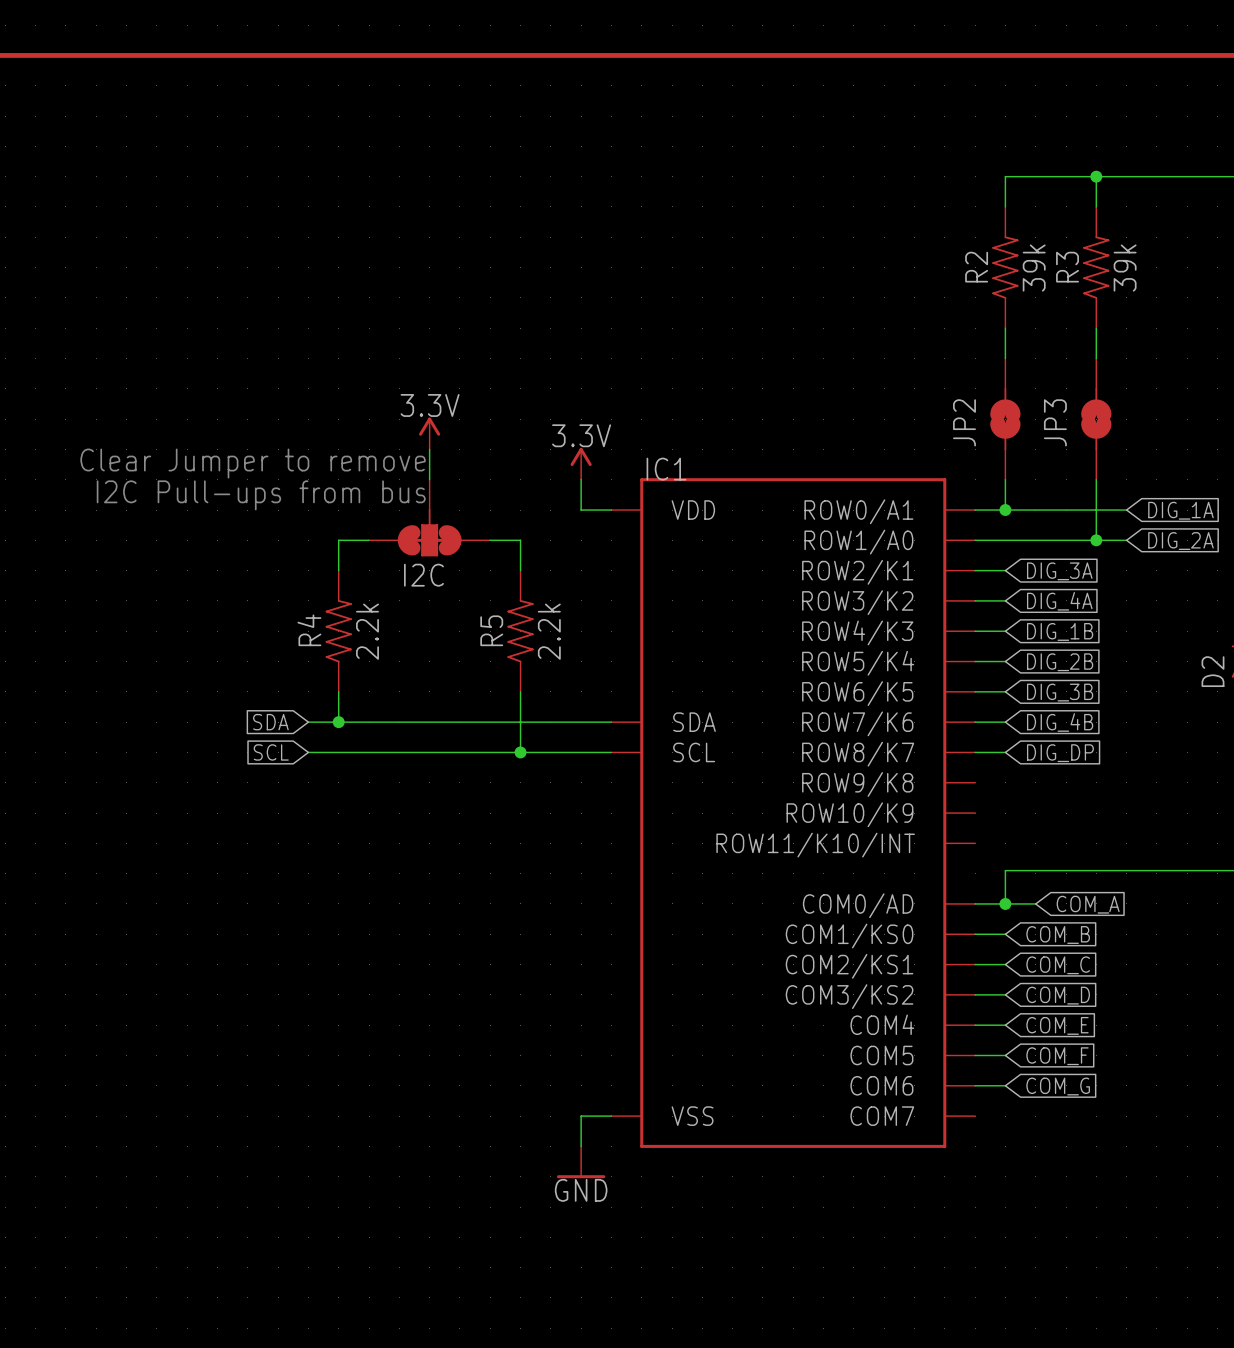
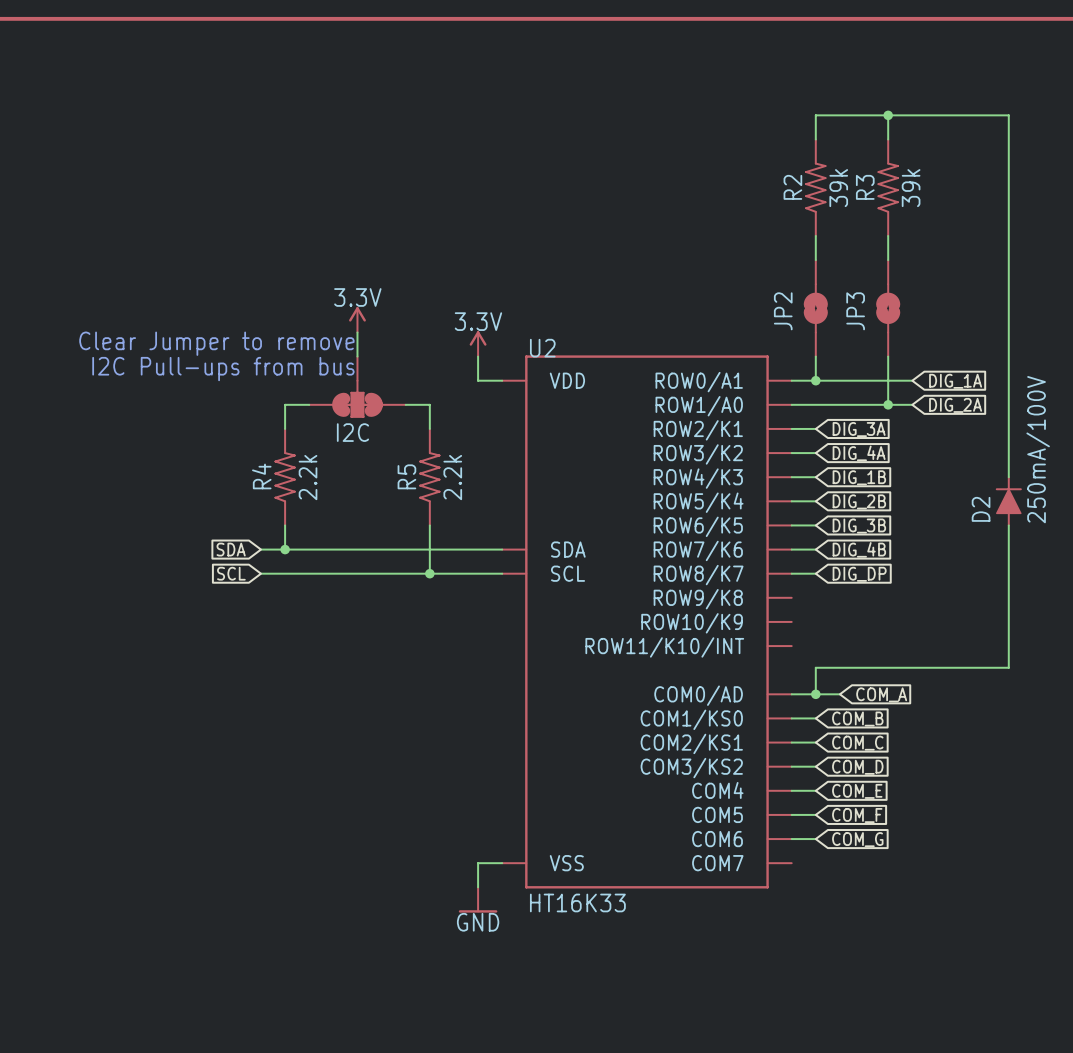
IC1 name: IC1 (666, 469) -> U2 (542, 348)
IC1 value: none -> HT16K33 (577, 902)

